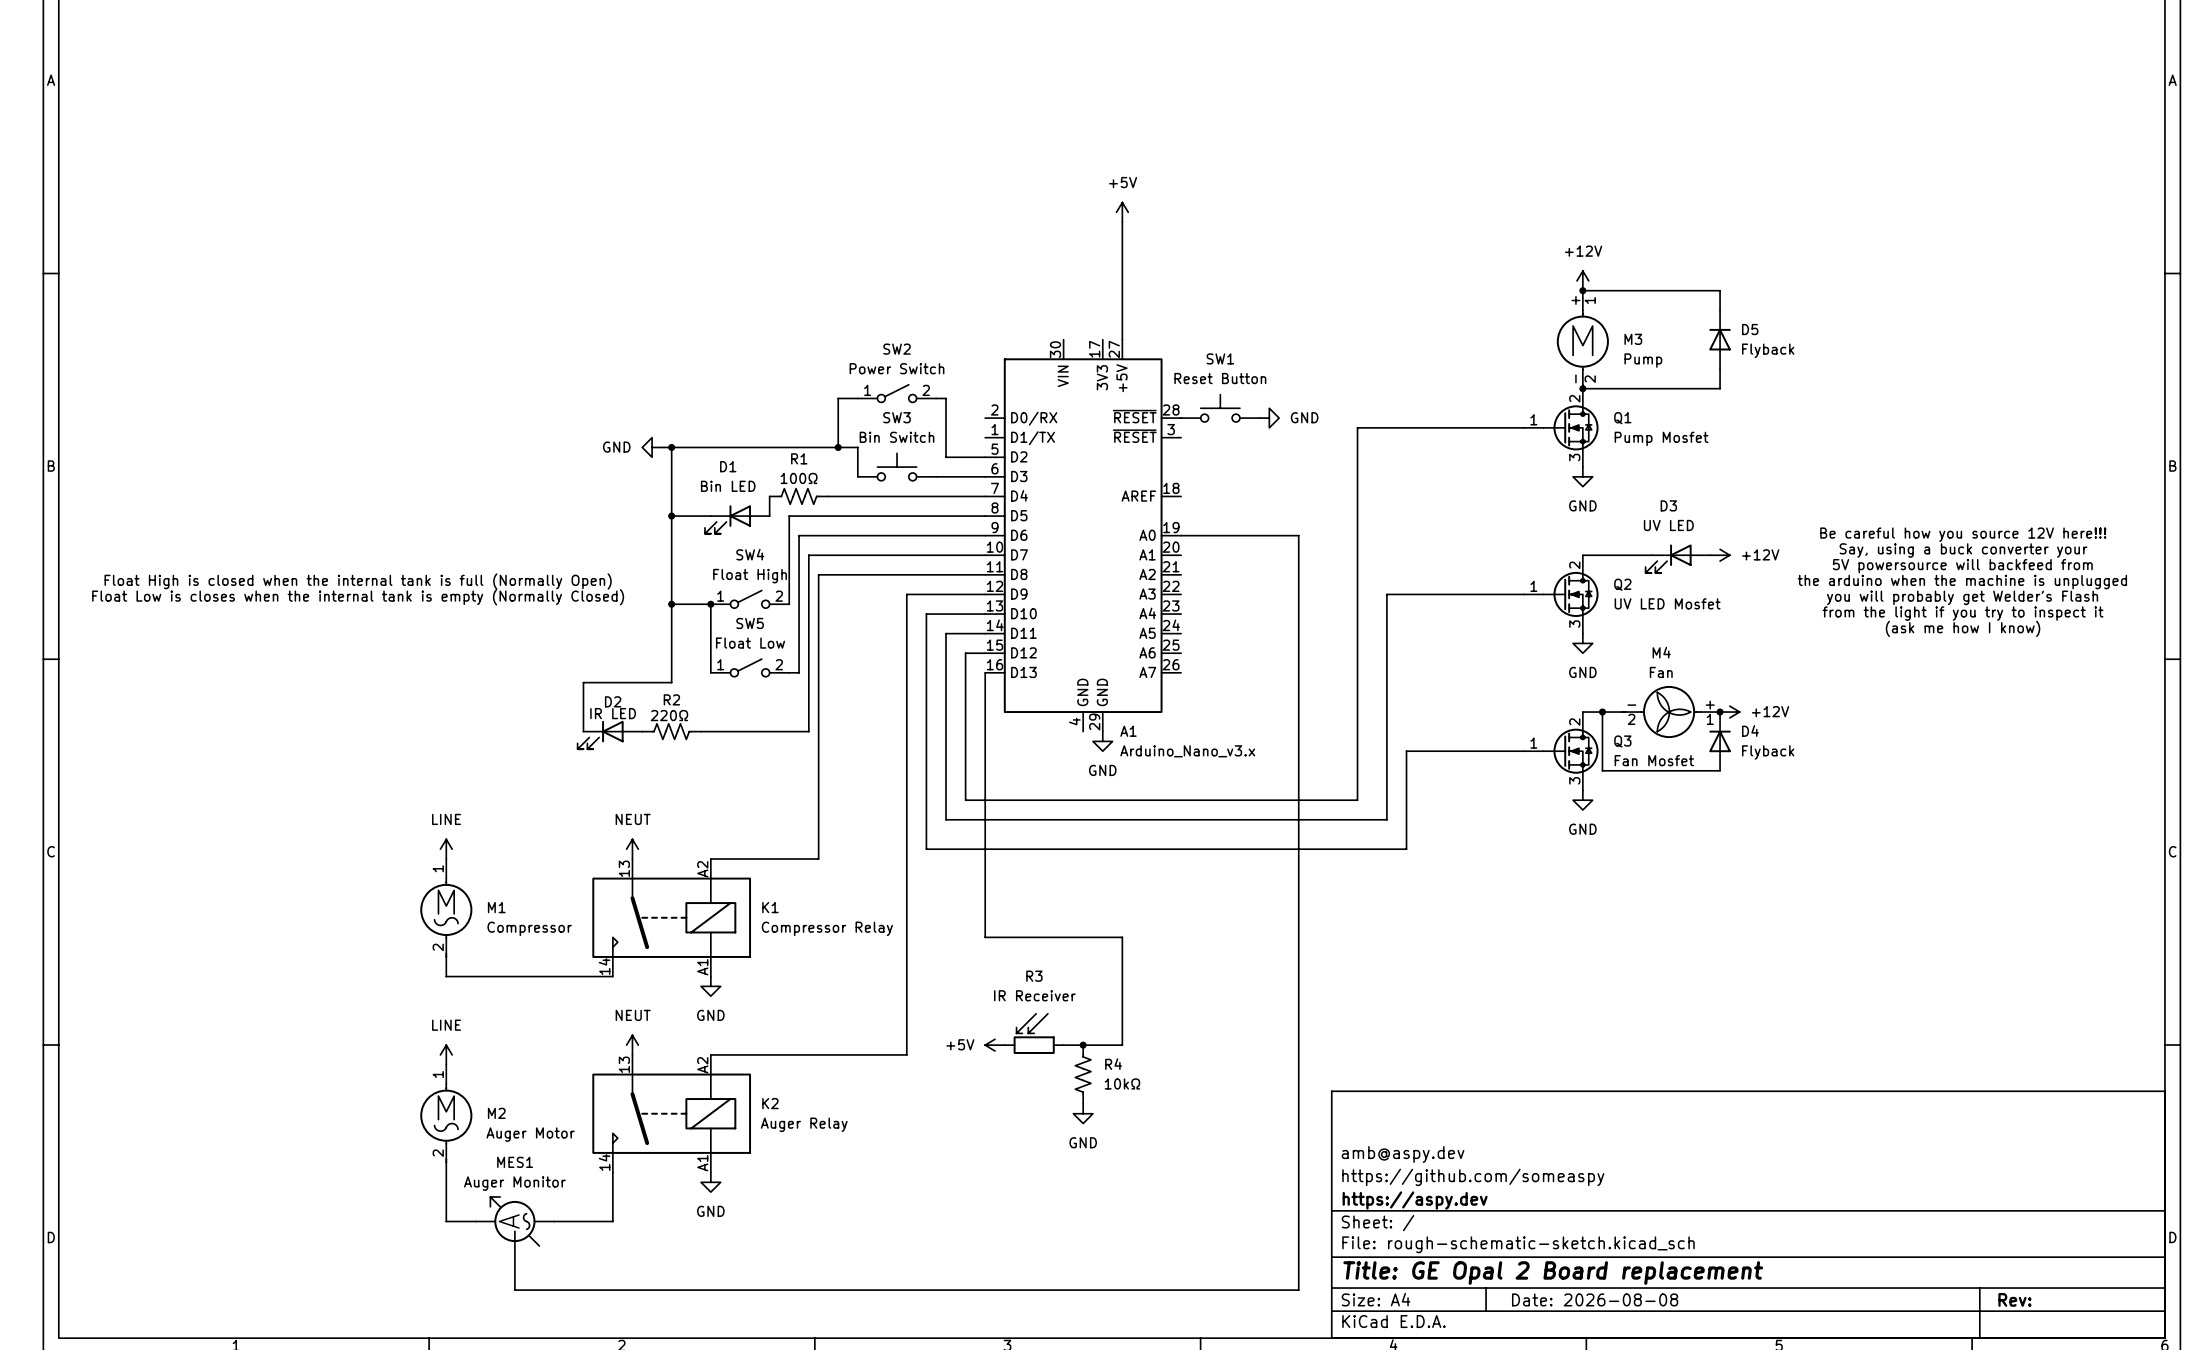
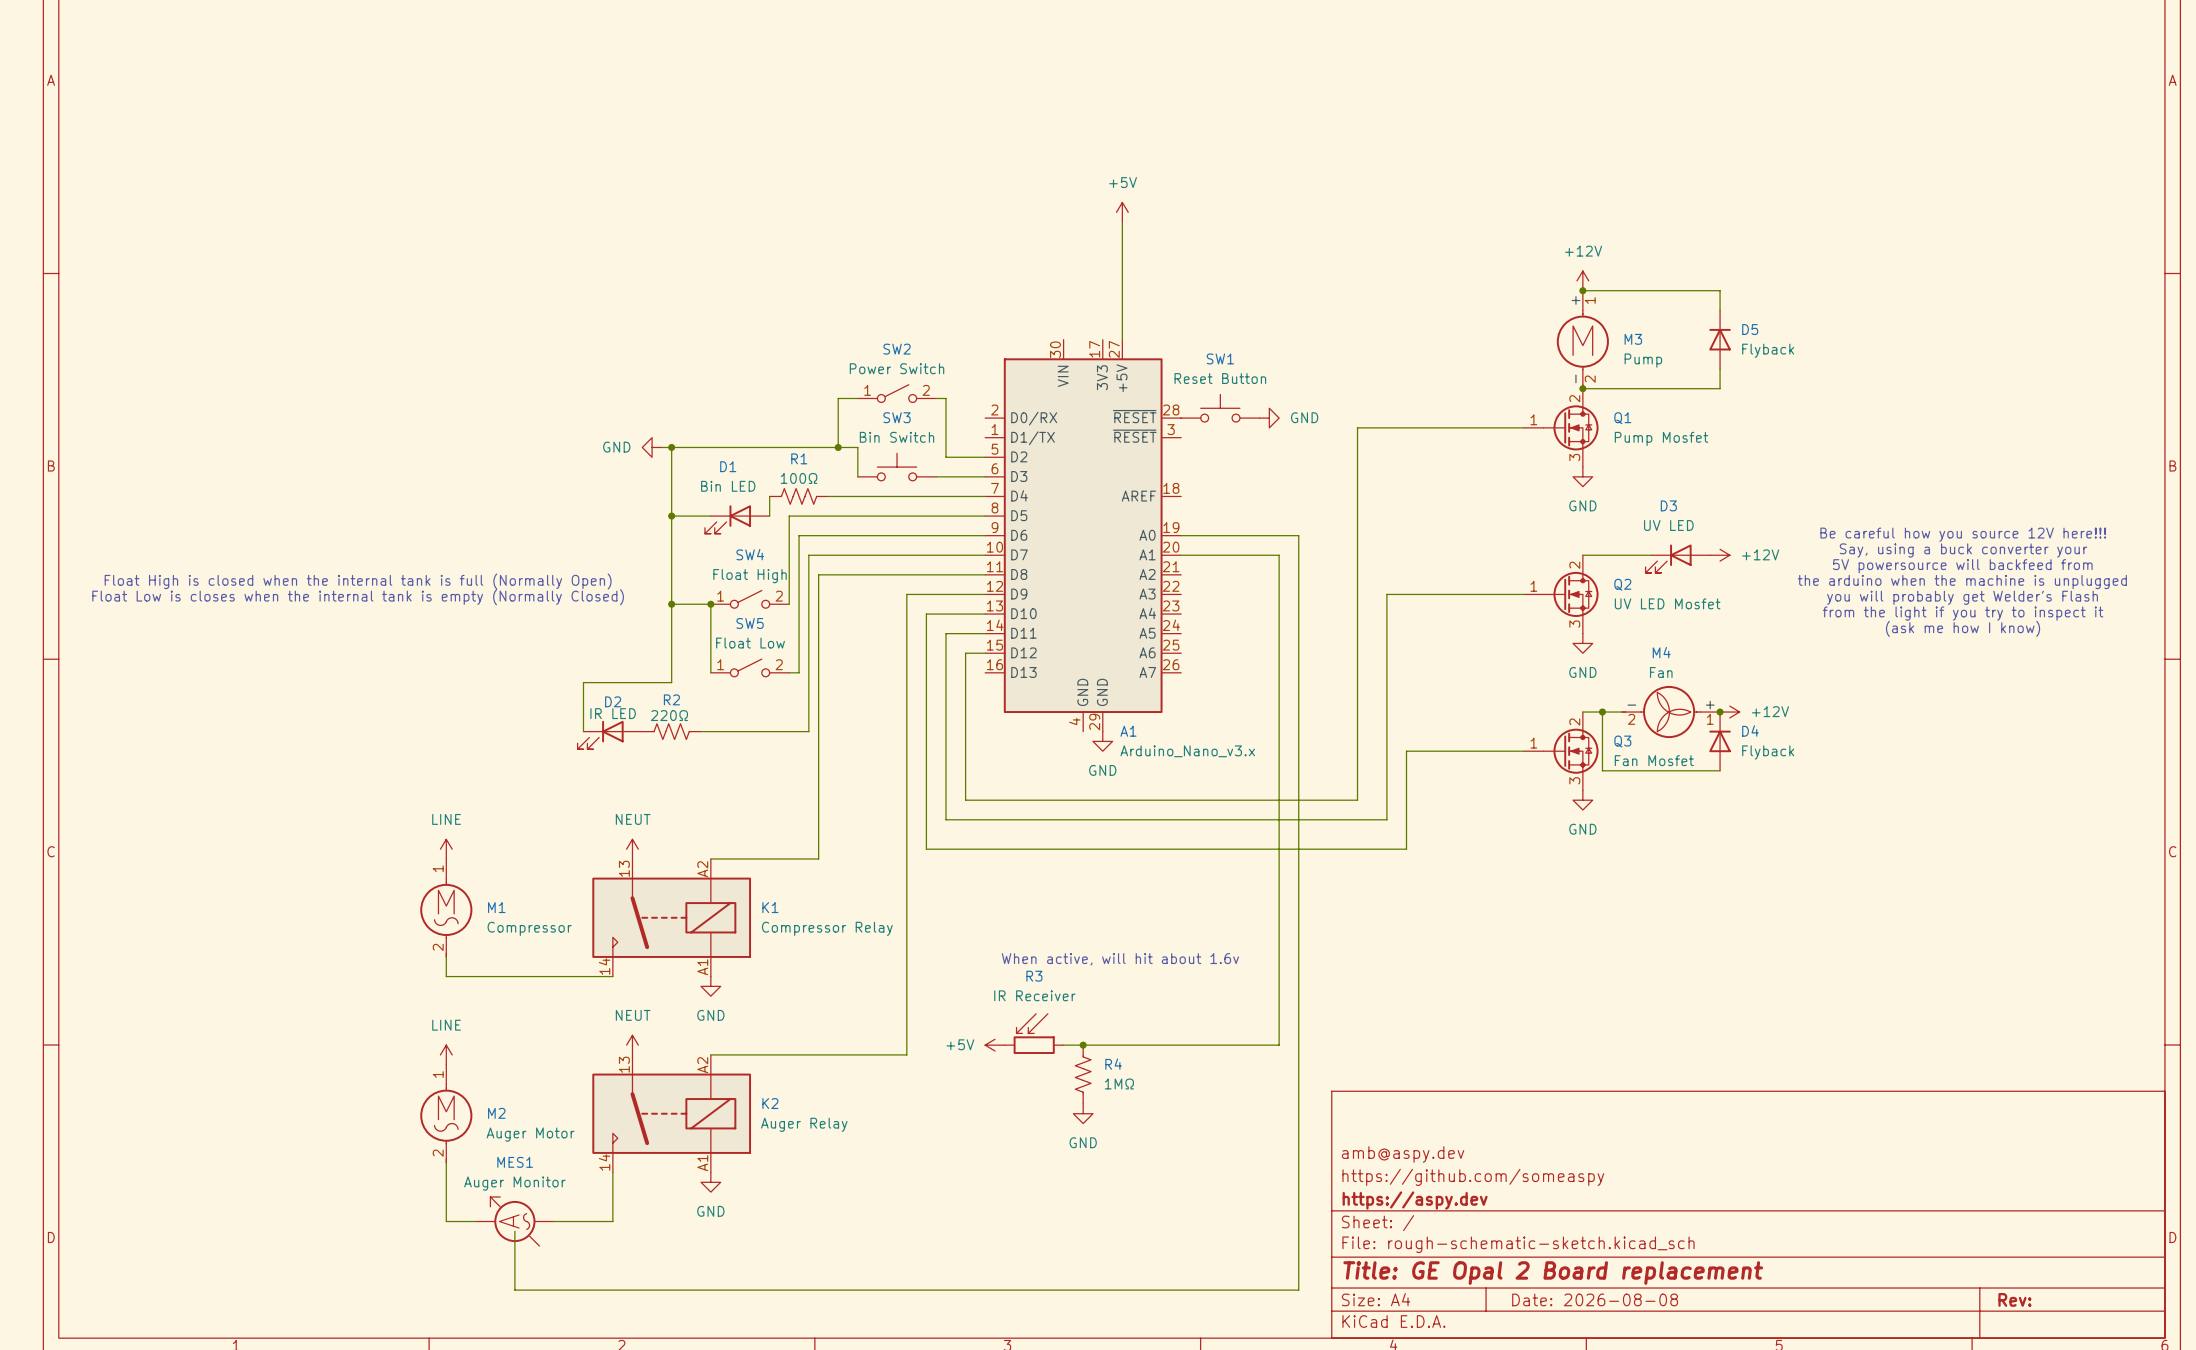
wire: (985, 672) (985, 937) (1122, 937) (1122, 1045) -> (1181, 555) (1279, 555) (1279, 1045) (1122, 1045)
text: none -> When active, will hit about 1.6v (1120, 959)
R4 value: 10kΩ (1122, 1083) -> 1MΩ (1119, 1083)

